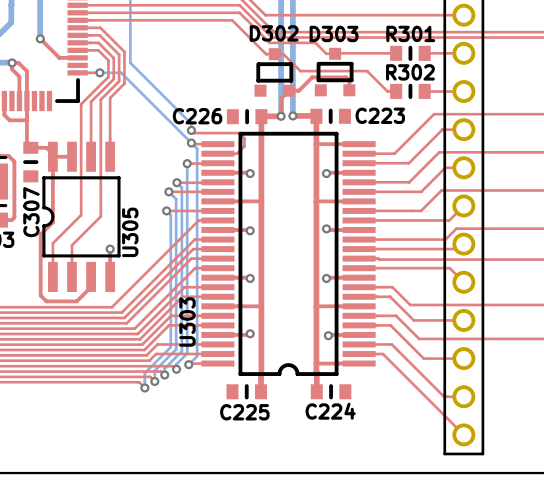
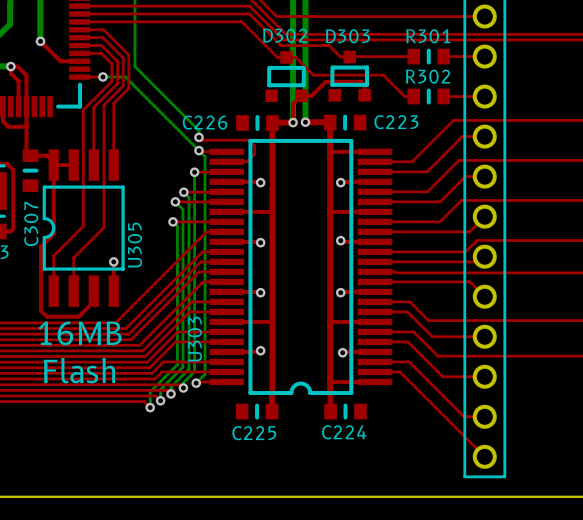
text: none -> 16MB (80, 333)
text: none -> Flash (79, 370)

